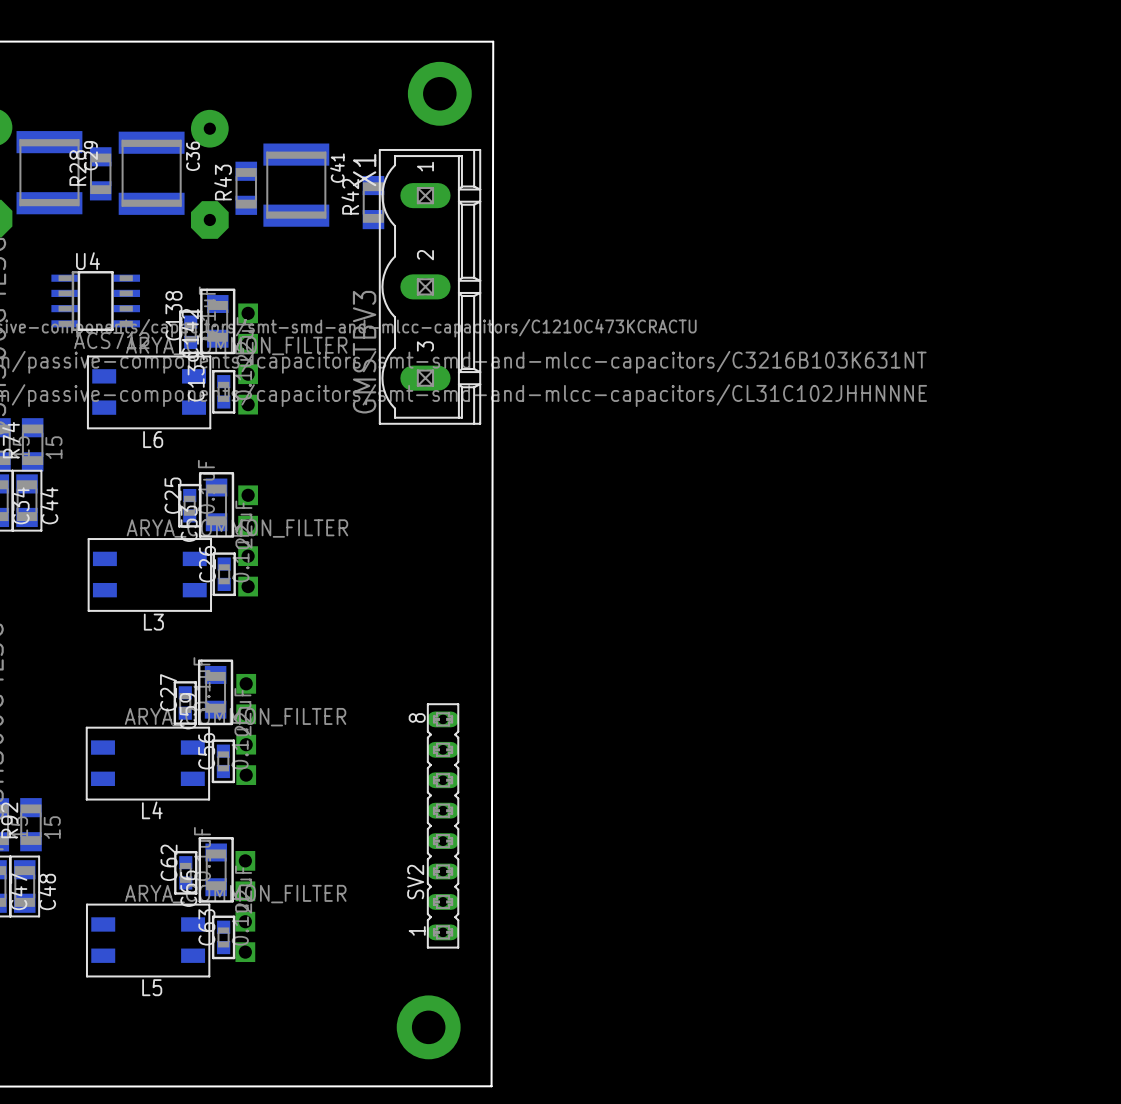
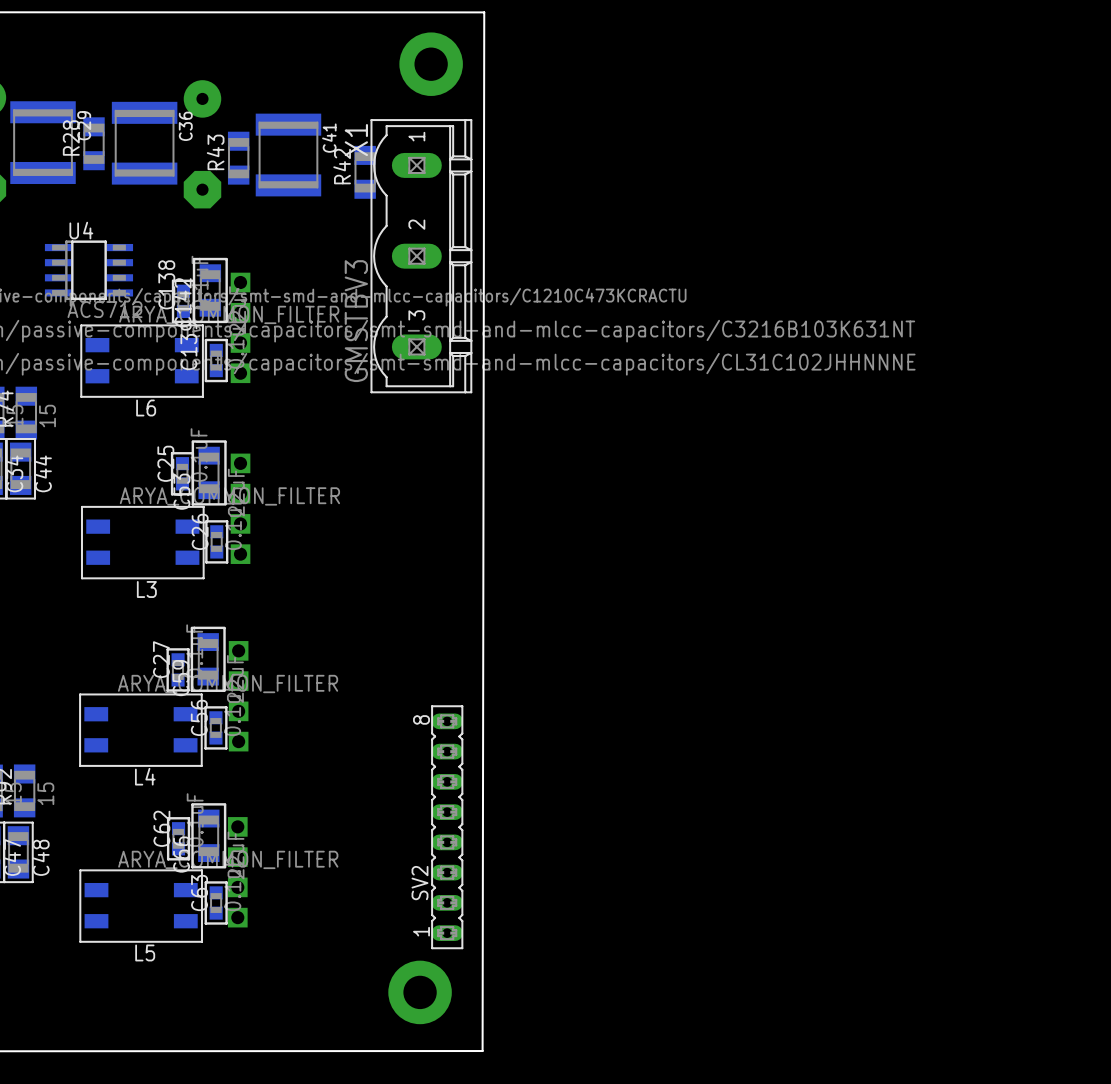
SV2 position: (443, 825) -> (447, 827)

